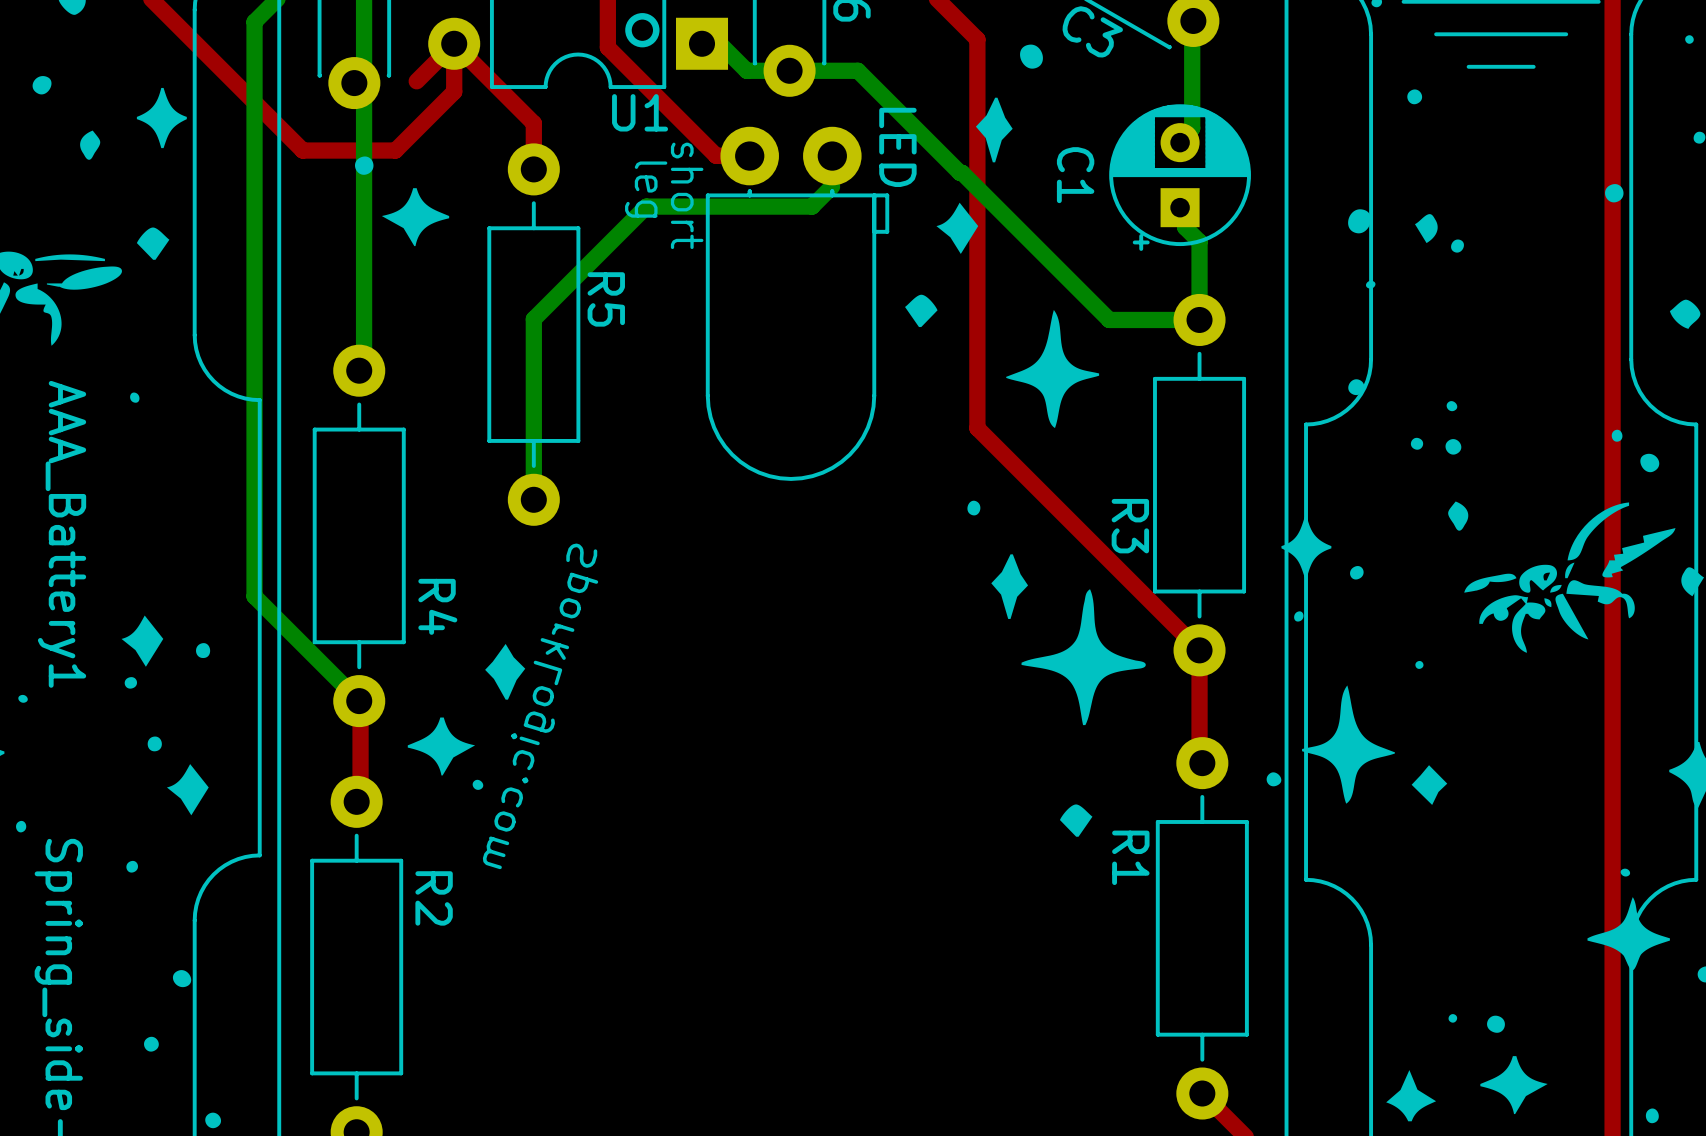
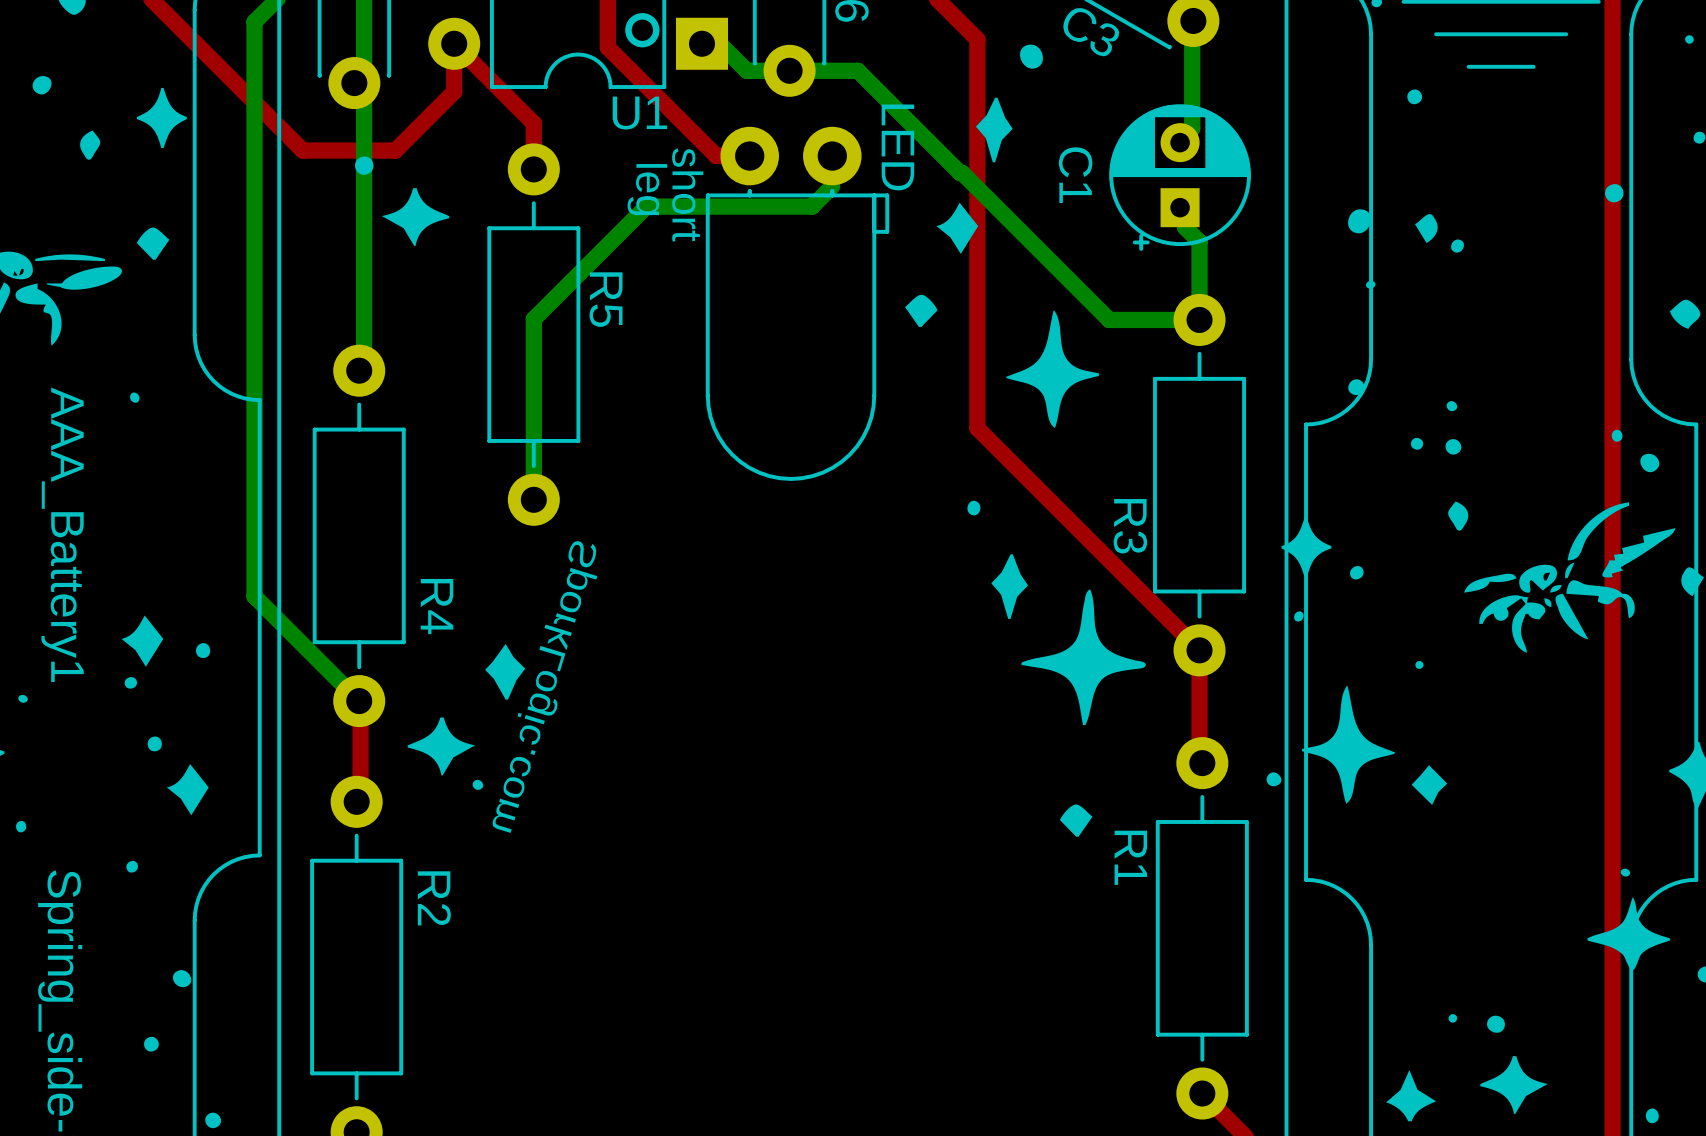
top track: (454, 43) (416, 81) -> none

